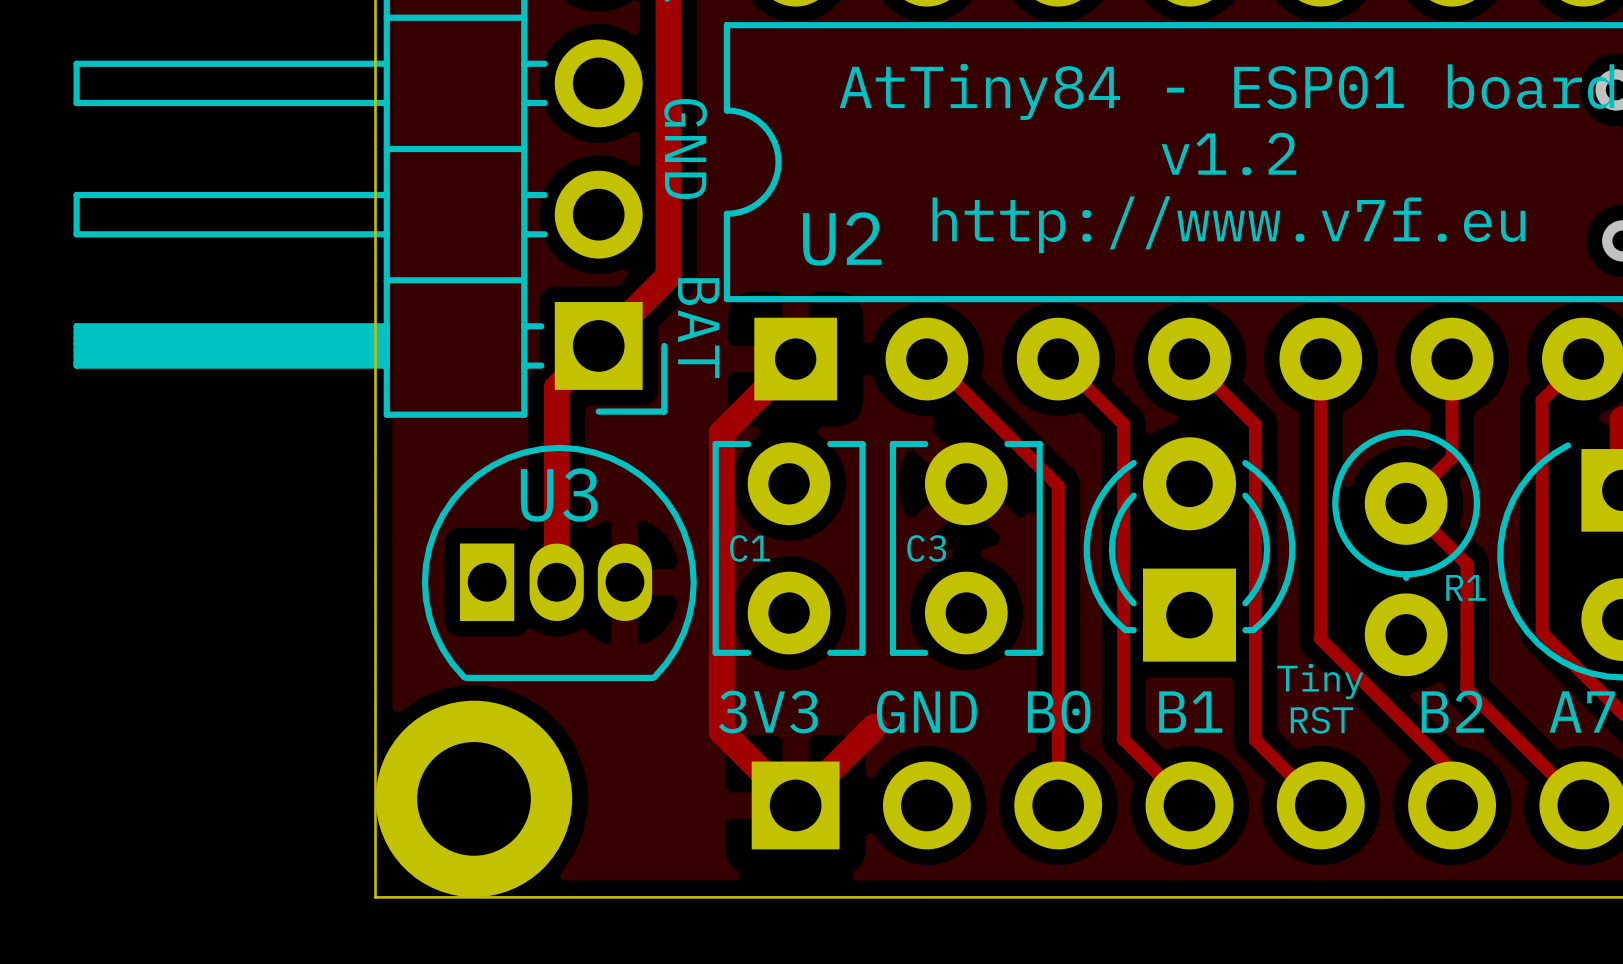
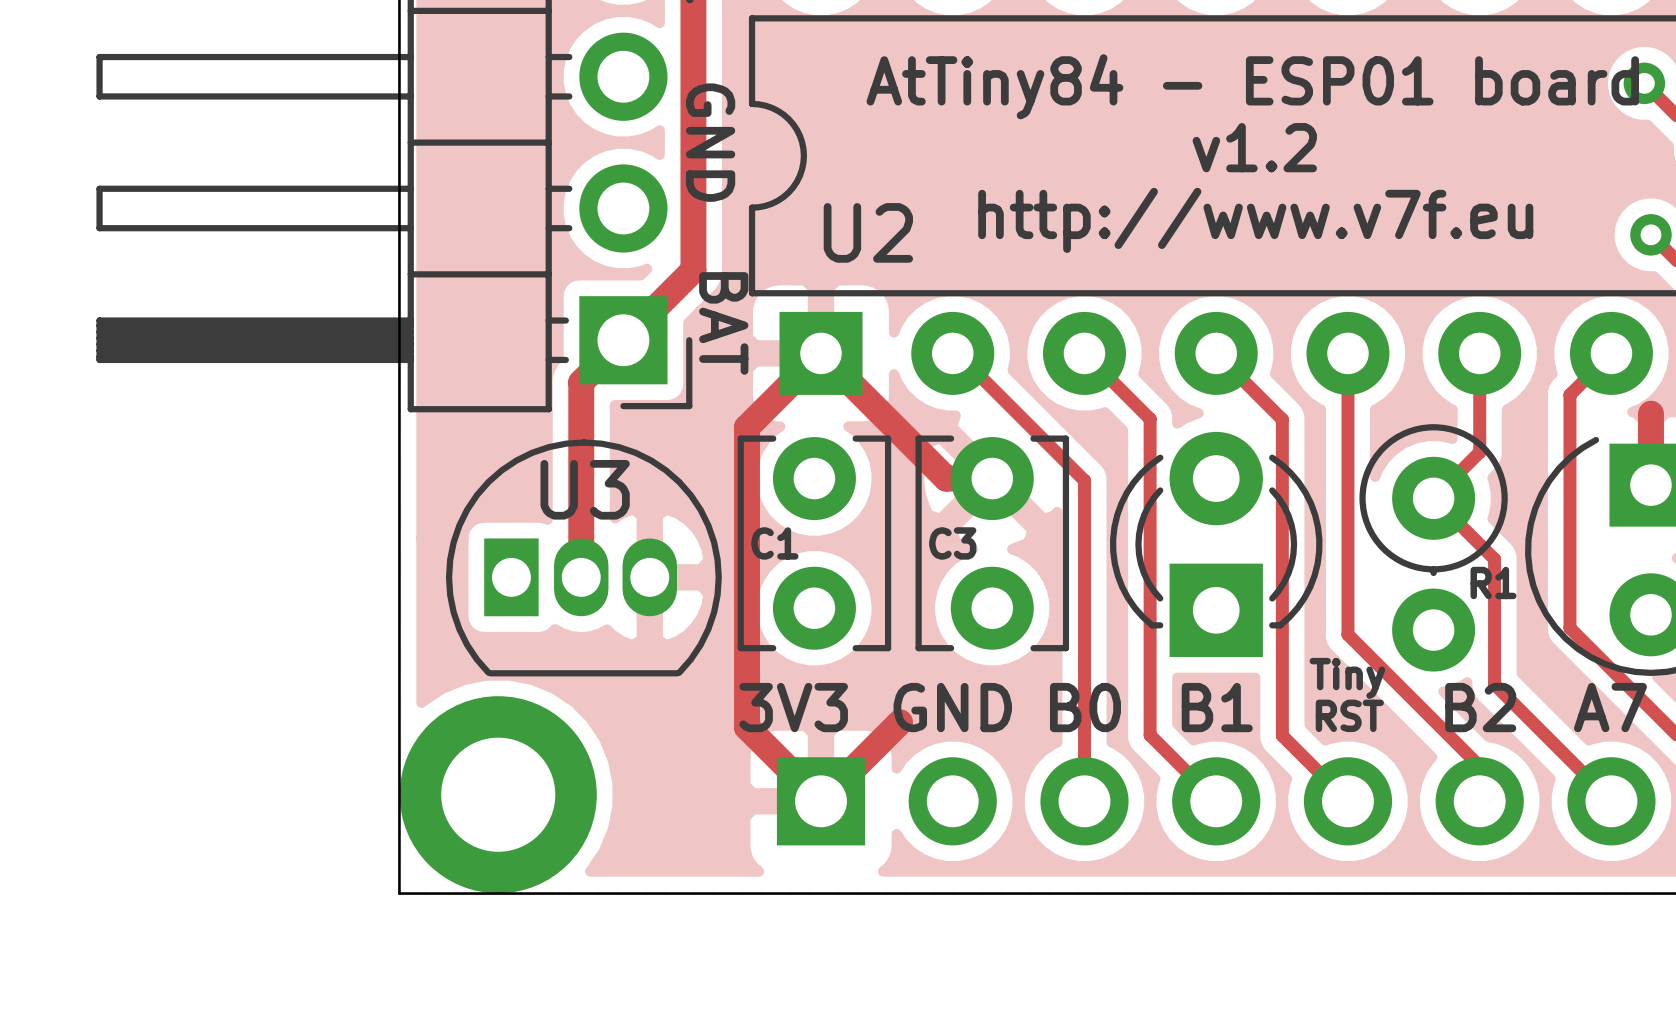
track: none -> (821, 353) (946, 478) (992, 478)

